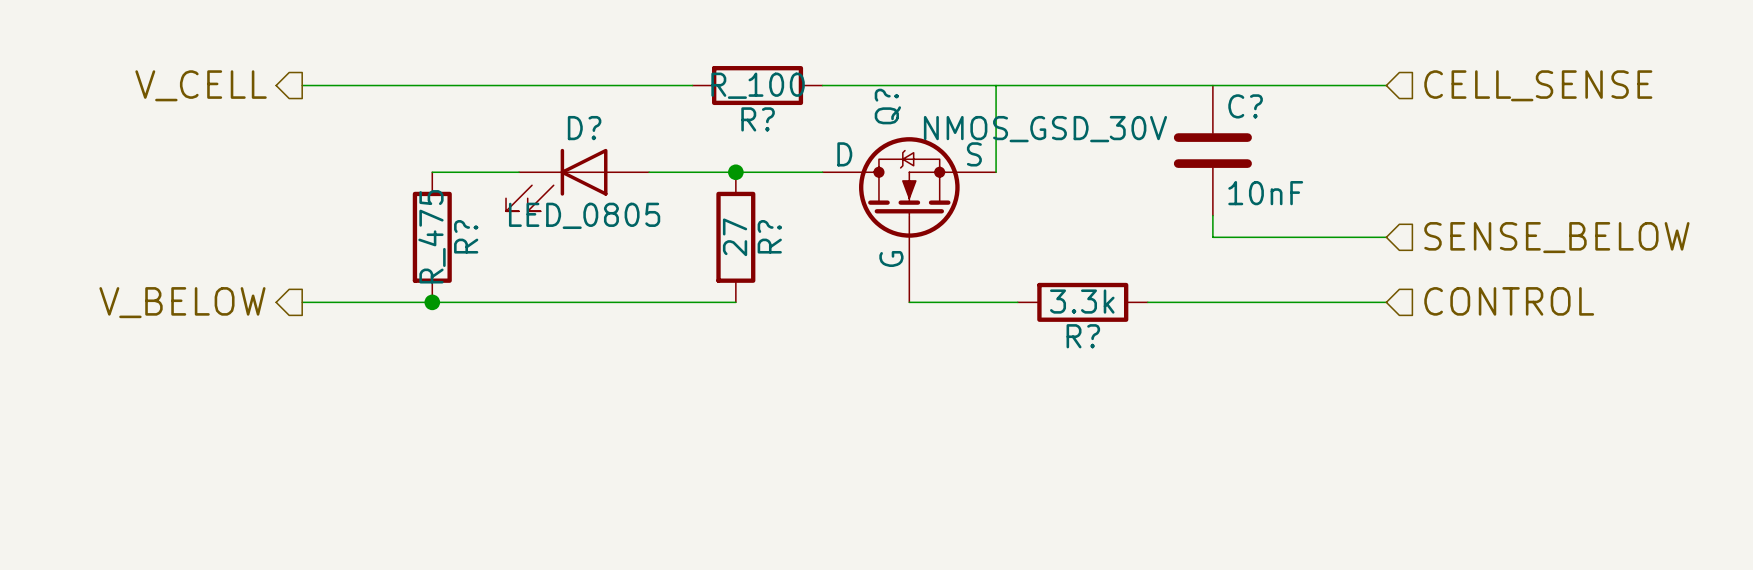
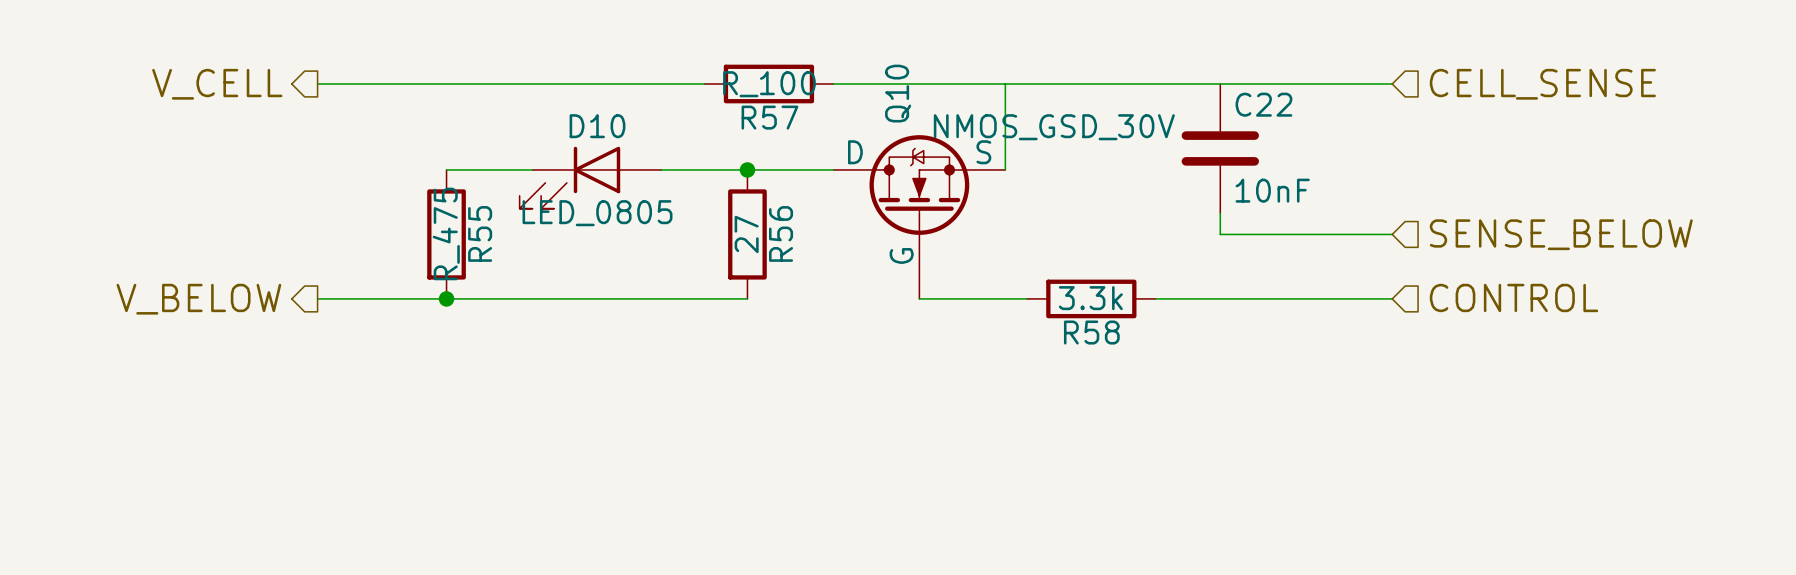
Q? name: Q? (887, 106) -> Q10 (898, 93)
C? name: C? (1245, 106) -> C22 (1263, 104)
R? name: R? (758, 119) -> R57 (769, 117)
D? name: D? (584, 128) -> D10 (597, 126)
R? name: R? (466, 236) -> R55 (480, 233)
R? name: R? (769, 236) -> R56 (781, 233)
R? name: R? (1083, 336) -> R58 (1091, 332)

